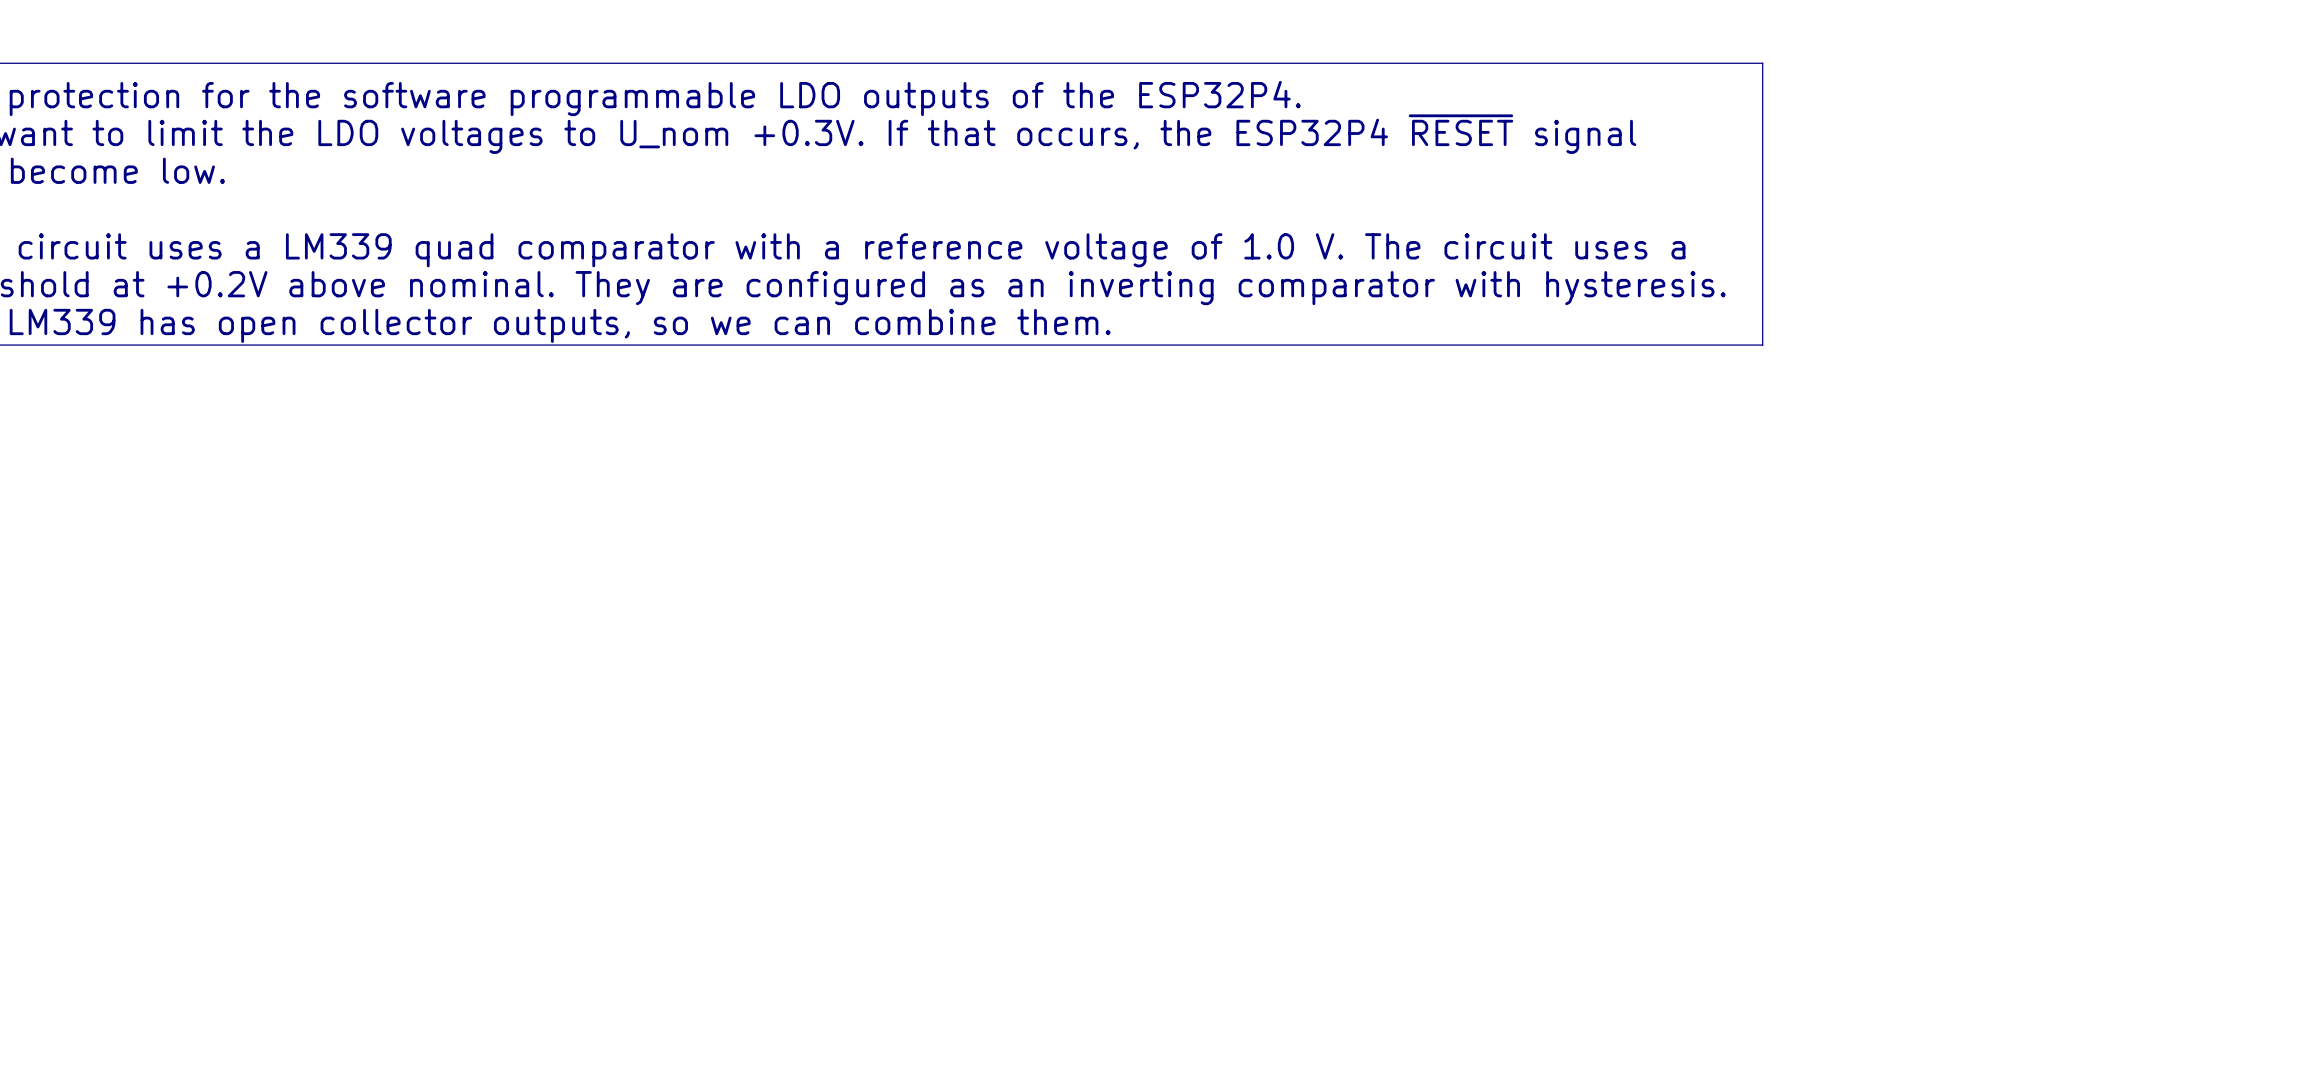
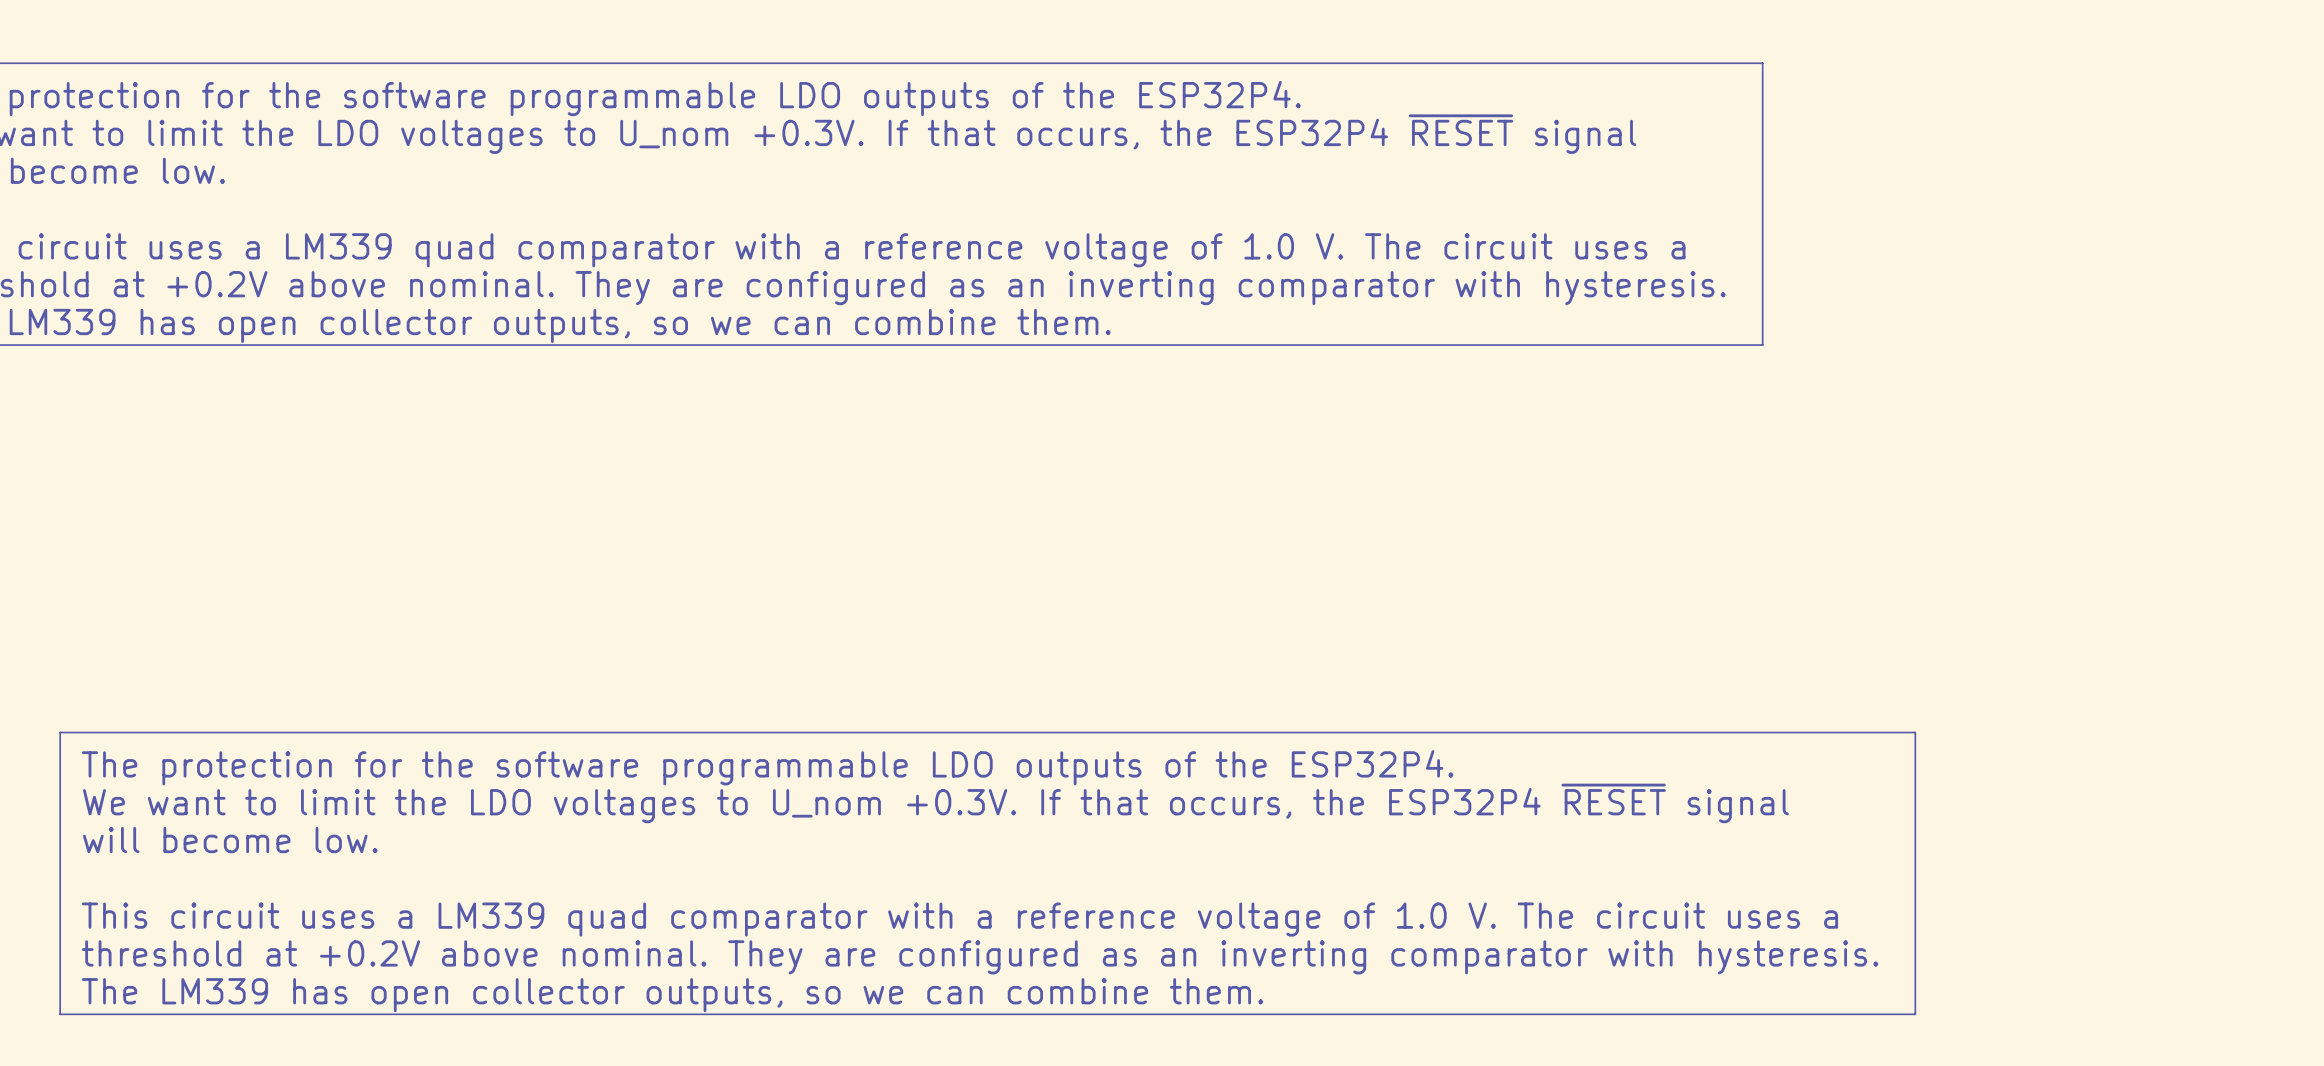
line: none -> (60, 732) (1915, 732) (1915, 1014) (60, 1014) (60, 732)
text: none -> The protection for the software programmable LDO outputs of the ESP32P4. (767, 767)
text: none -> We want to limit the LDO voltages to U_nom +0.3V. If that occurs, the ESP32P4 ~{RESET} signal (935, 803)
text: none -> will become low. (230, 840)
text: none -> This circuit uses a LM339 quad comparator with a reference voltage of 1.0 V. The circuit uses a (959, 919)
text: none -> threshold at +0.2V above nominal. They are configured as an inverting comparator with hysteresis. (980, 957)
text: none -> The LM339 has open collector outputs, so we can combine them. (672, 995)

